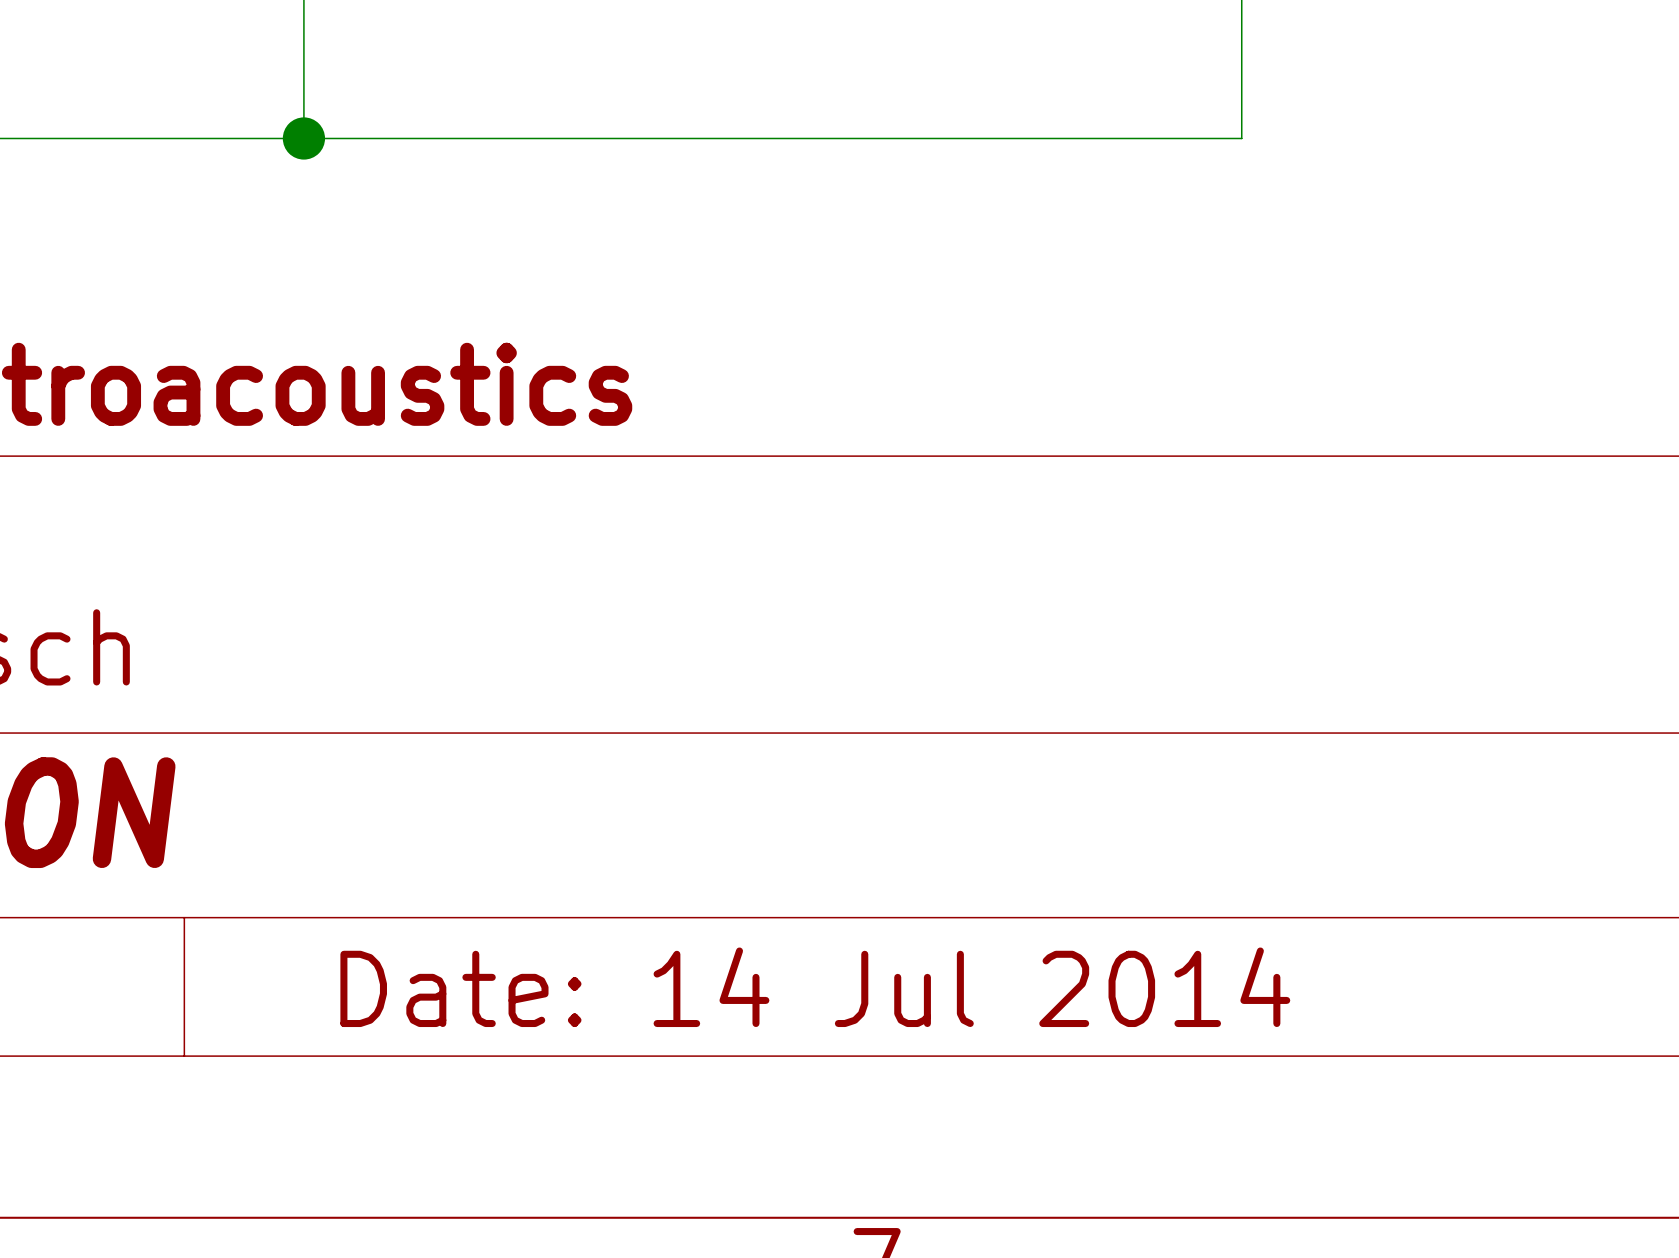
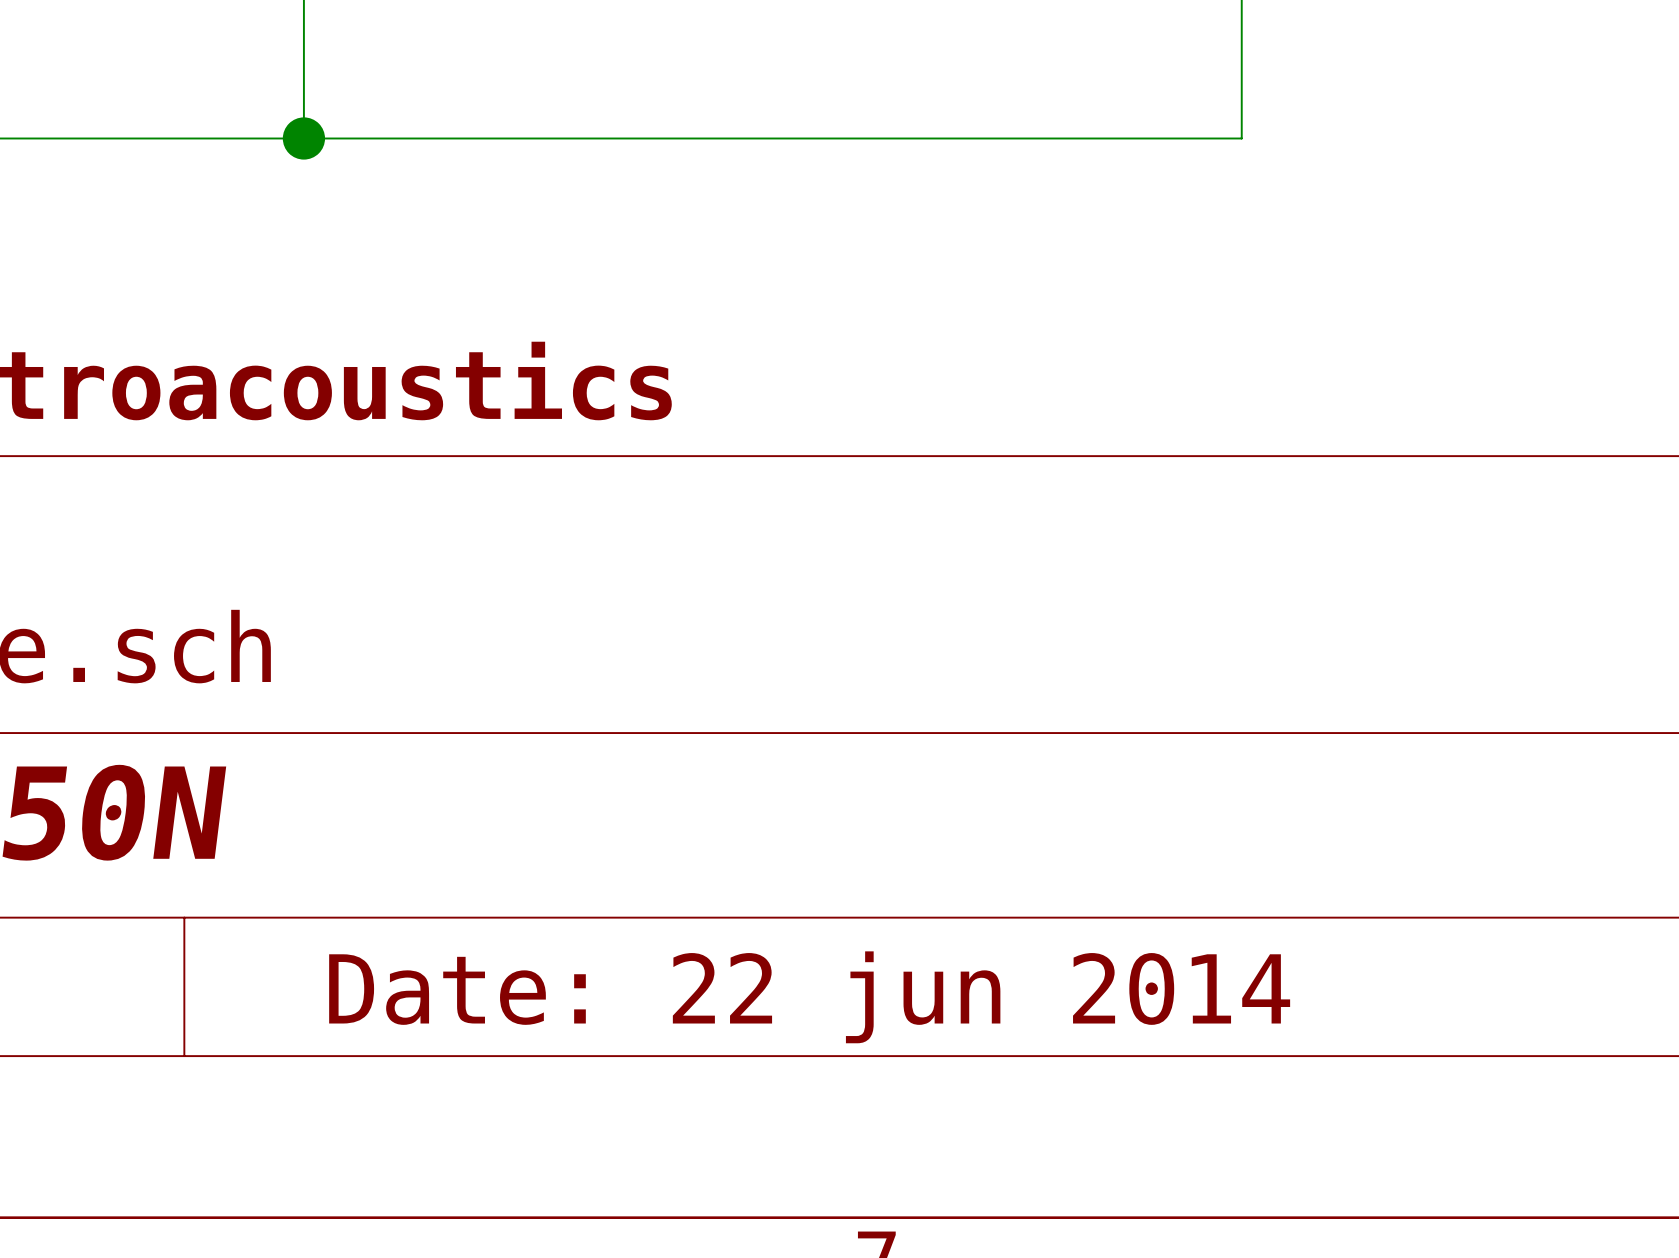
title block: Date: 14 Jul 2014 (815, 987) -> Date: 22 jun 2014 (809, 997)

